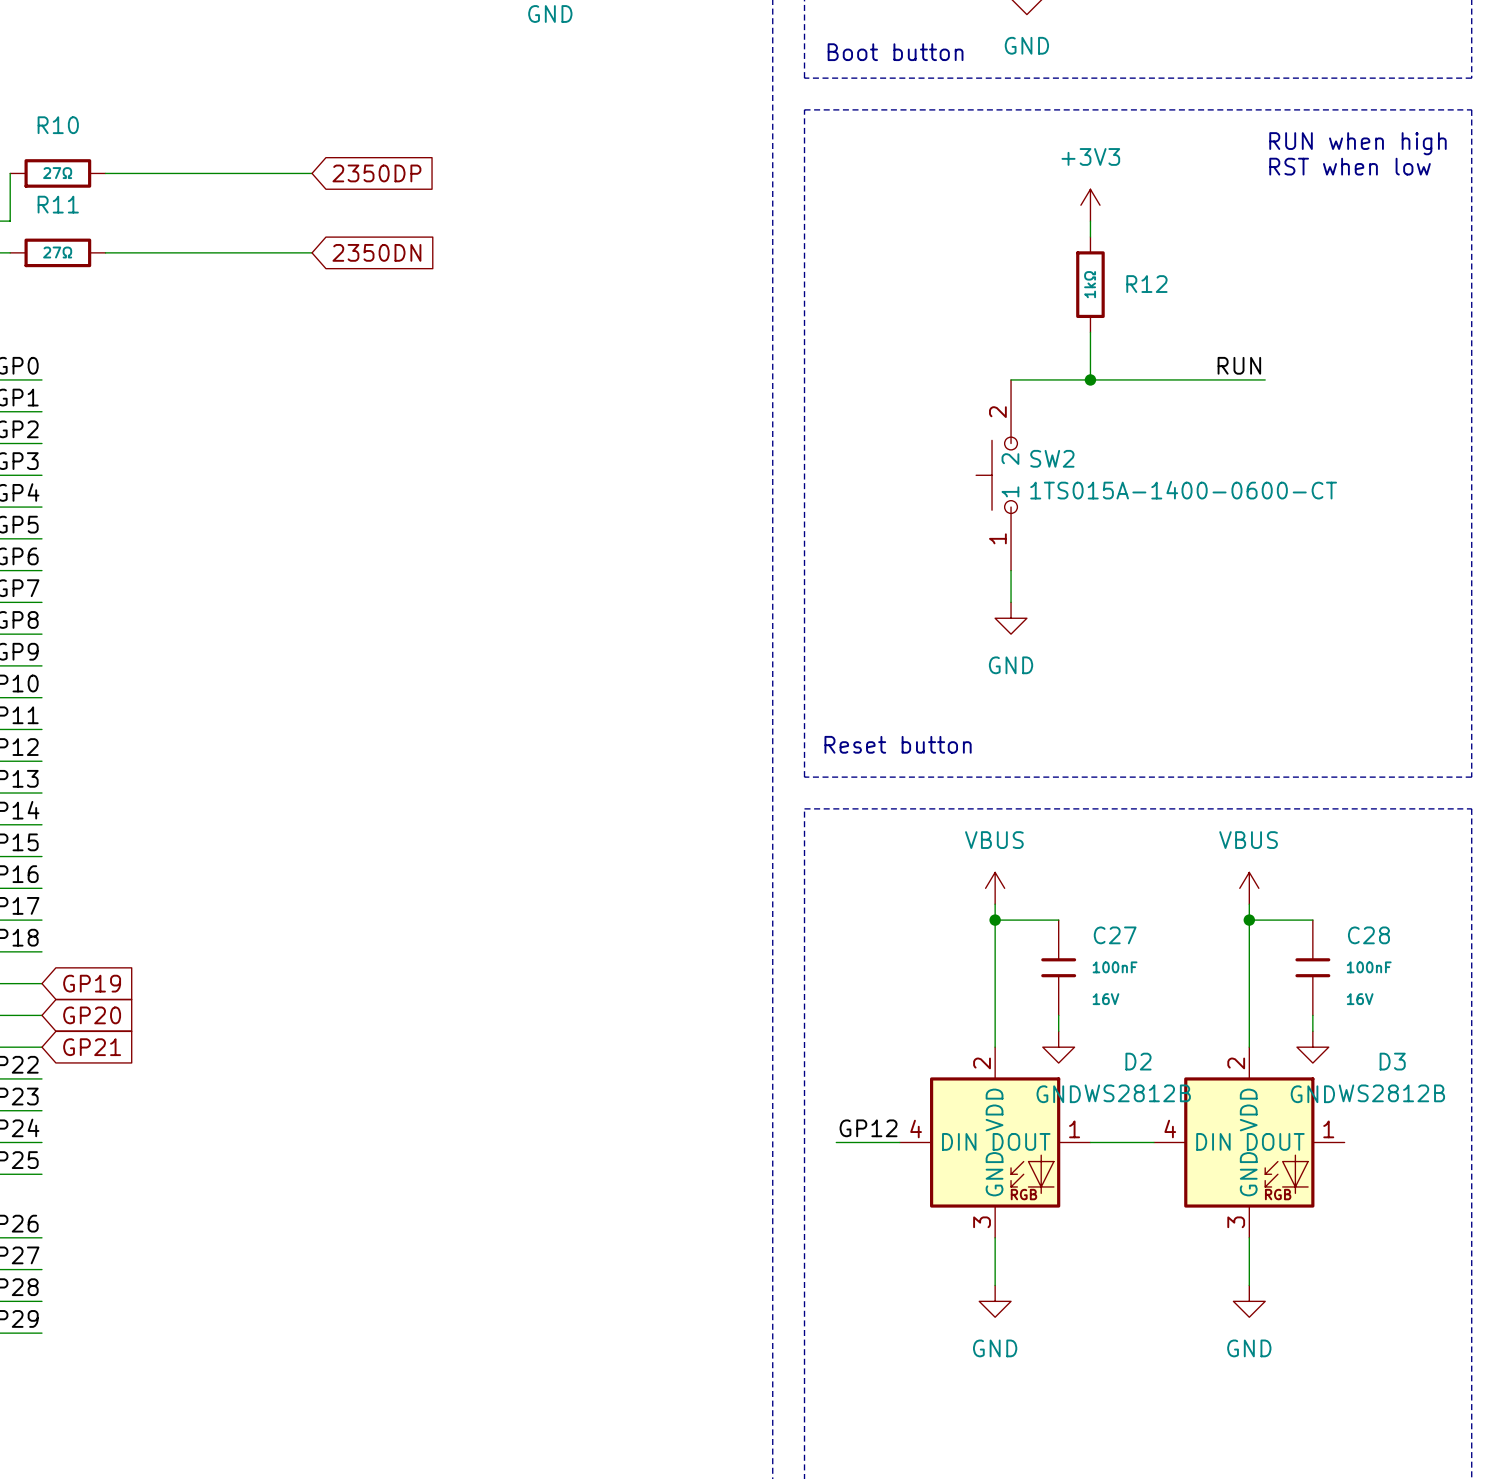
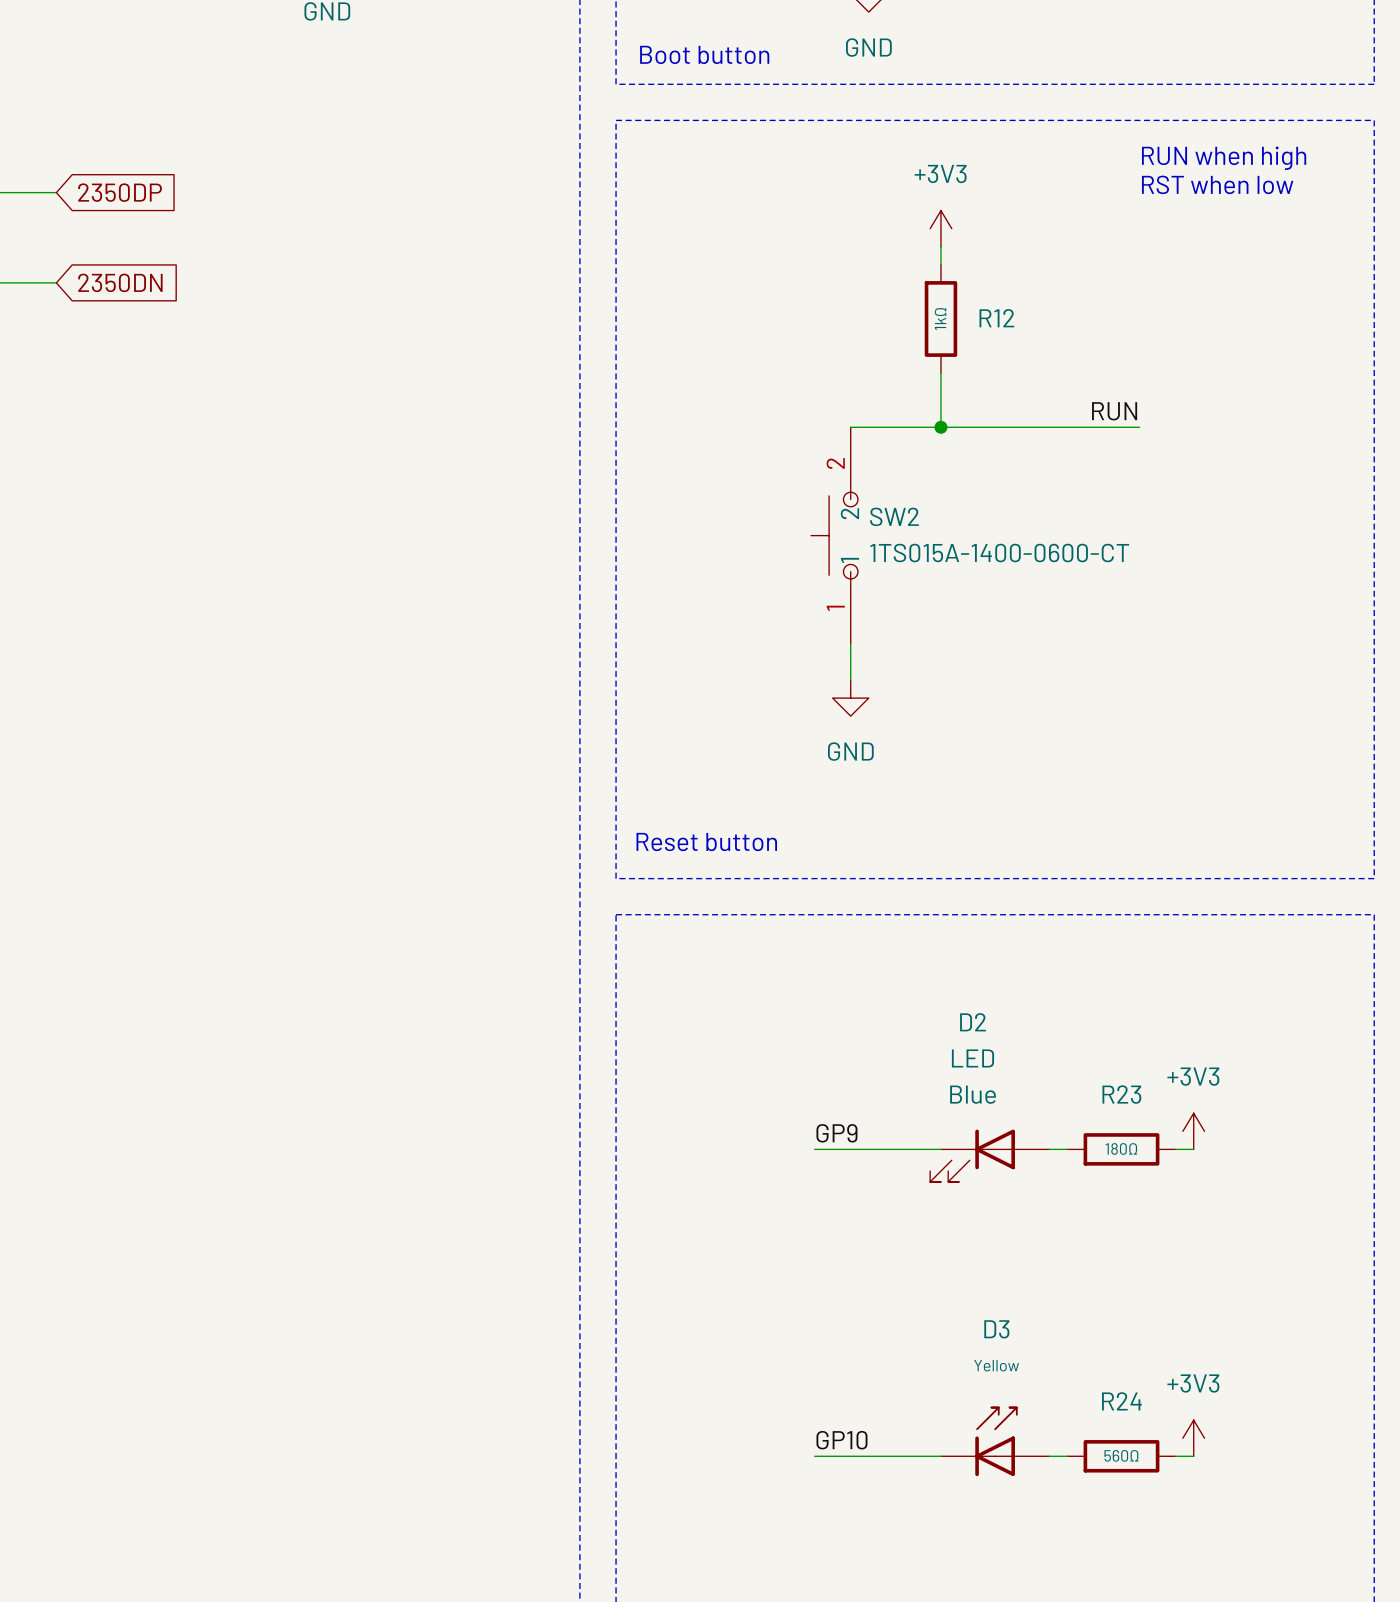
power symbol: VBUS (995, 888) -> none
power symbol: VBUS (1249, 888) -> none
wire: (995, 904) (995, 1047) -> none
wire: (1249, 904) (1249, 1047) -> none
wire: (995, 920) (1058, 920) -> none
junction: (995, 920) -> none
wire: (1249, 920) (1312, 920) -> none
junction: (1249, 920) -> none
C27: 100nF (1058, 967) -> none
D2 text: none -> Blue (972, 1094)
C28: 100nF (1312, 967) -> none
power symbol: none -> +3V3 (1193, 1131)
label: none -> GP9 (836, 1133)
wire: none -> (814, 1149) (940, 1149)
wire: (1058, 1015) (1058, 1031) -> none
wire: none -> (1049, 1149) (1067, 1149)
R23: none -> 180Ω (1121, 1149)
wire: (1312, 1015) (1312, 1031) -> (1193, 1149) (1175, 1149)
D2 symbol: [899, 1047, 1091, 1238] -> [930, 1129, 1050, 1182]
power symbol: GND (1058, 1047) -> none
D3 symbol: [1154, 1047, 1345, 1238] -> [940, 1406, 1050, 1477]
power symbol: GND (1312, 1047) -> none
D2 name position: D2 (1138, 1061) -> D2 (973, 1022)
D3 name position: D3 (1392, 1061) -> D3 (996, 1329)
D2 value: WS2812B (1137, 1093) -> LED (972, 1058)
D3 value: WS2812B (1391, 1093) -> Yellow (996, 1365)
label: GP12 (868, 1128) -> none
wire: (836, 1142) (899, 1142) -> none
wire: (1090, 1142) (1154, 1142) -> none
wire: (995, 1237) (995, 1285) -> none
wire: (1249, 1237) (1249, 1285) -> none
power symbol: none -> +3V3 (1193, 1438)
label: none -> GP10 (841, 1440)
wire: none -> (814, 1456) (940, 1456)
wire: none -> (1049, 1456) (1067, 1456)
R24: none -> 560Ω (1121, 1456)
wire: none -> (1175, 1456) (1193, 1456)
power symbol: GND (995, 1301) -> none
power symbol: GND (1249, 1301) -> none

